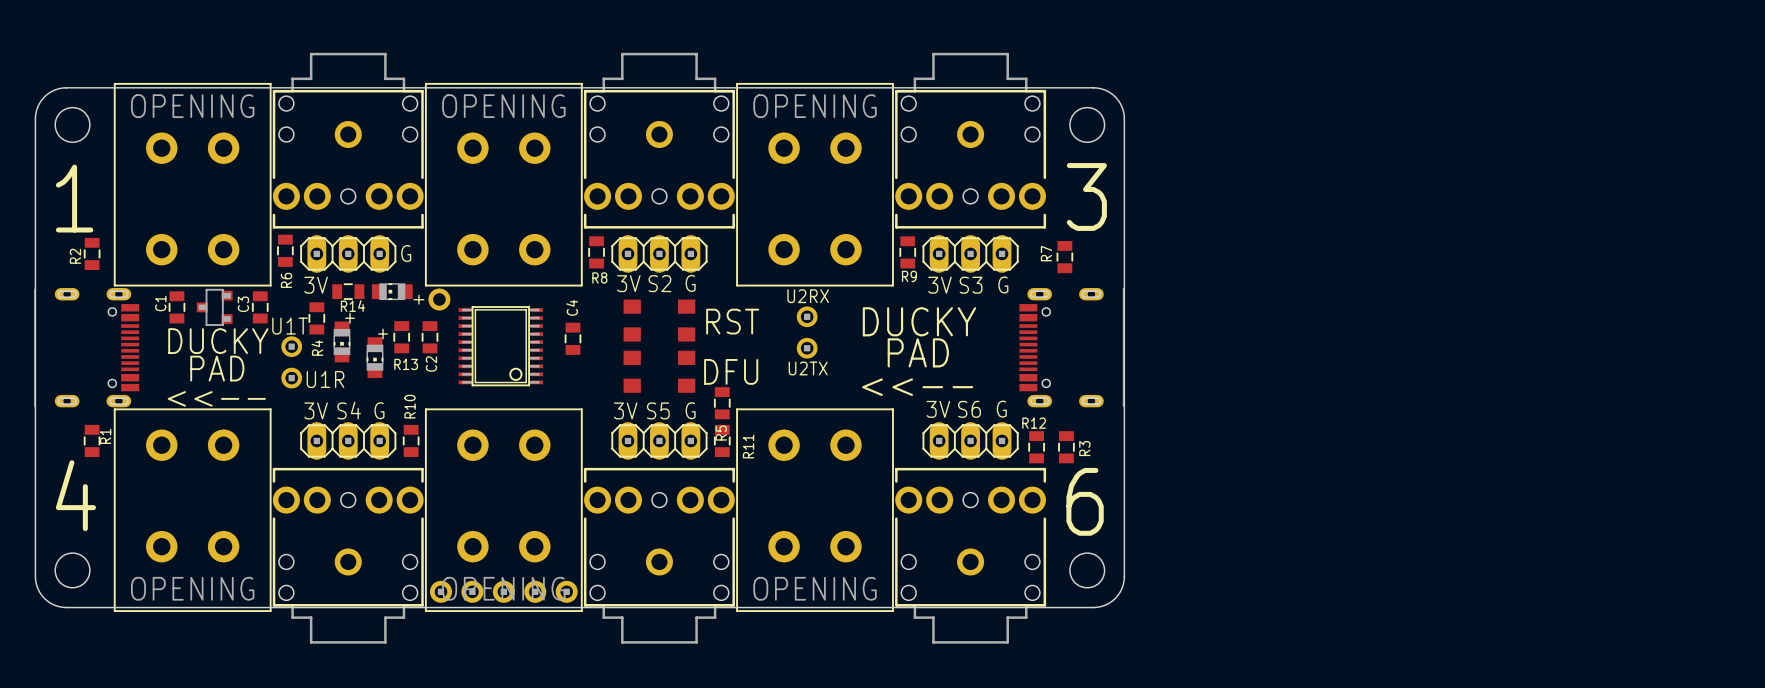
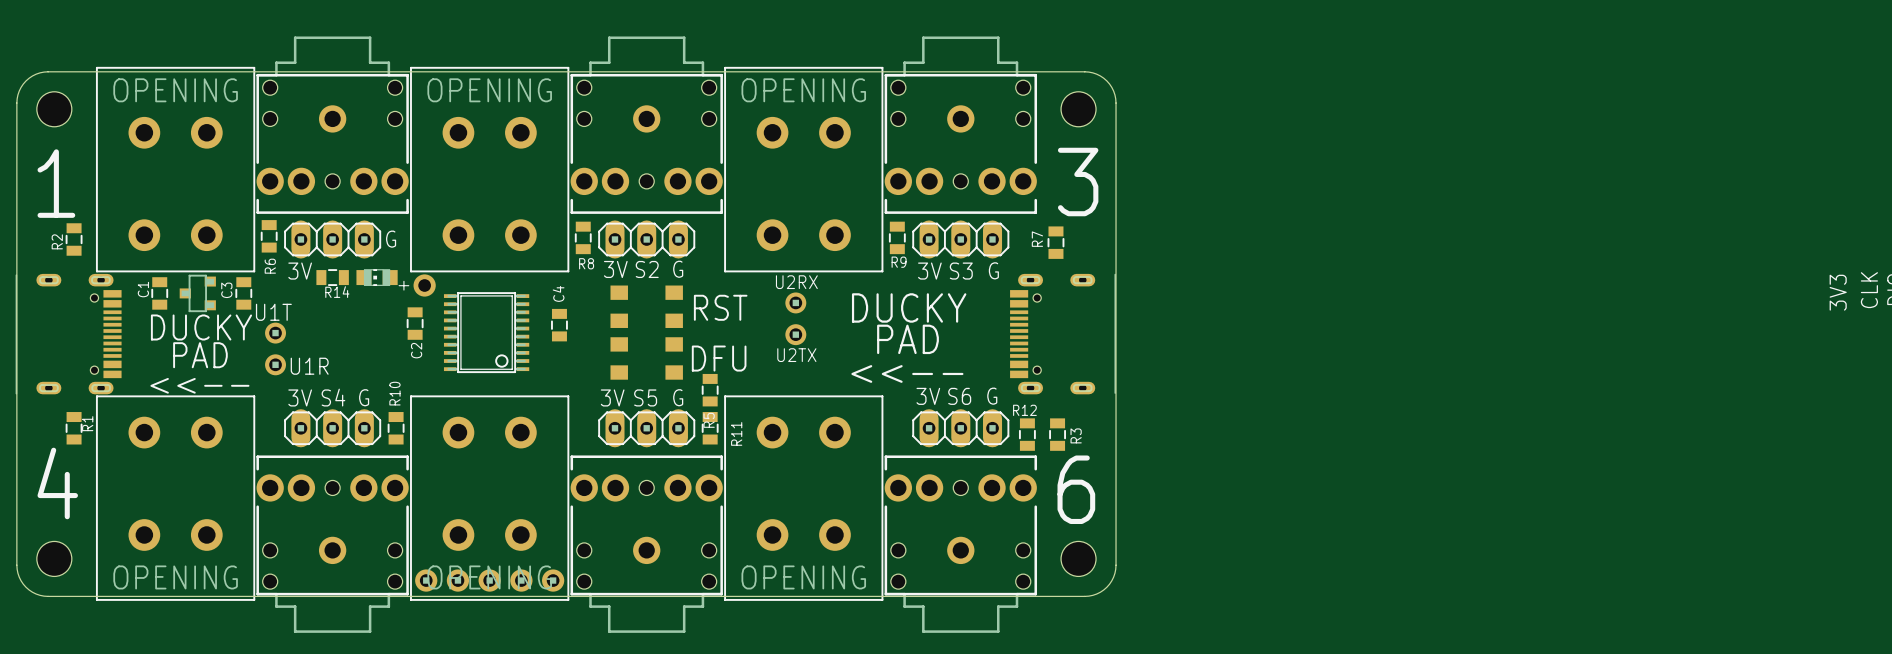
R4: (316, 318) -> none
R13: (401, 337) -> none
part: (341, 341) -> none
part: (374, 357) -> none

